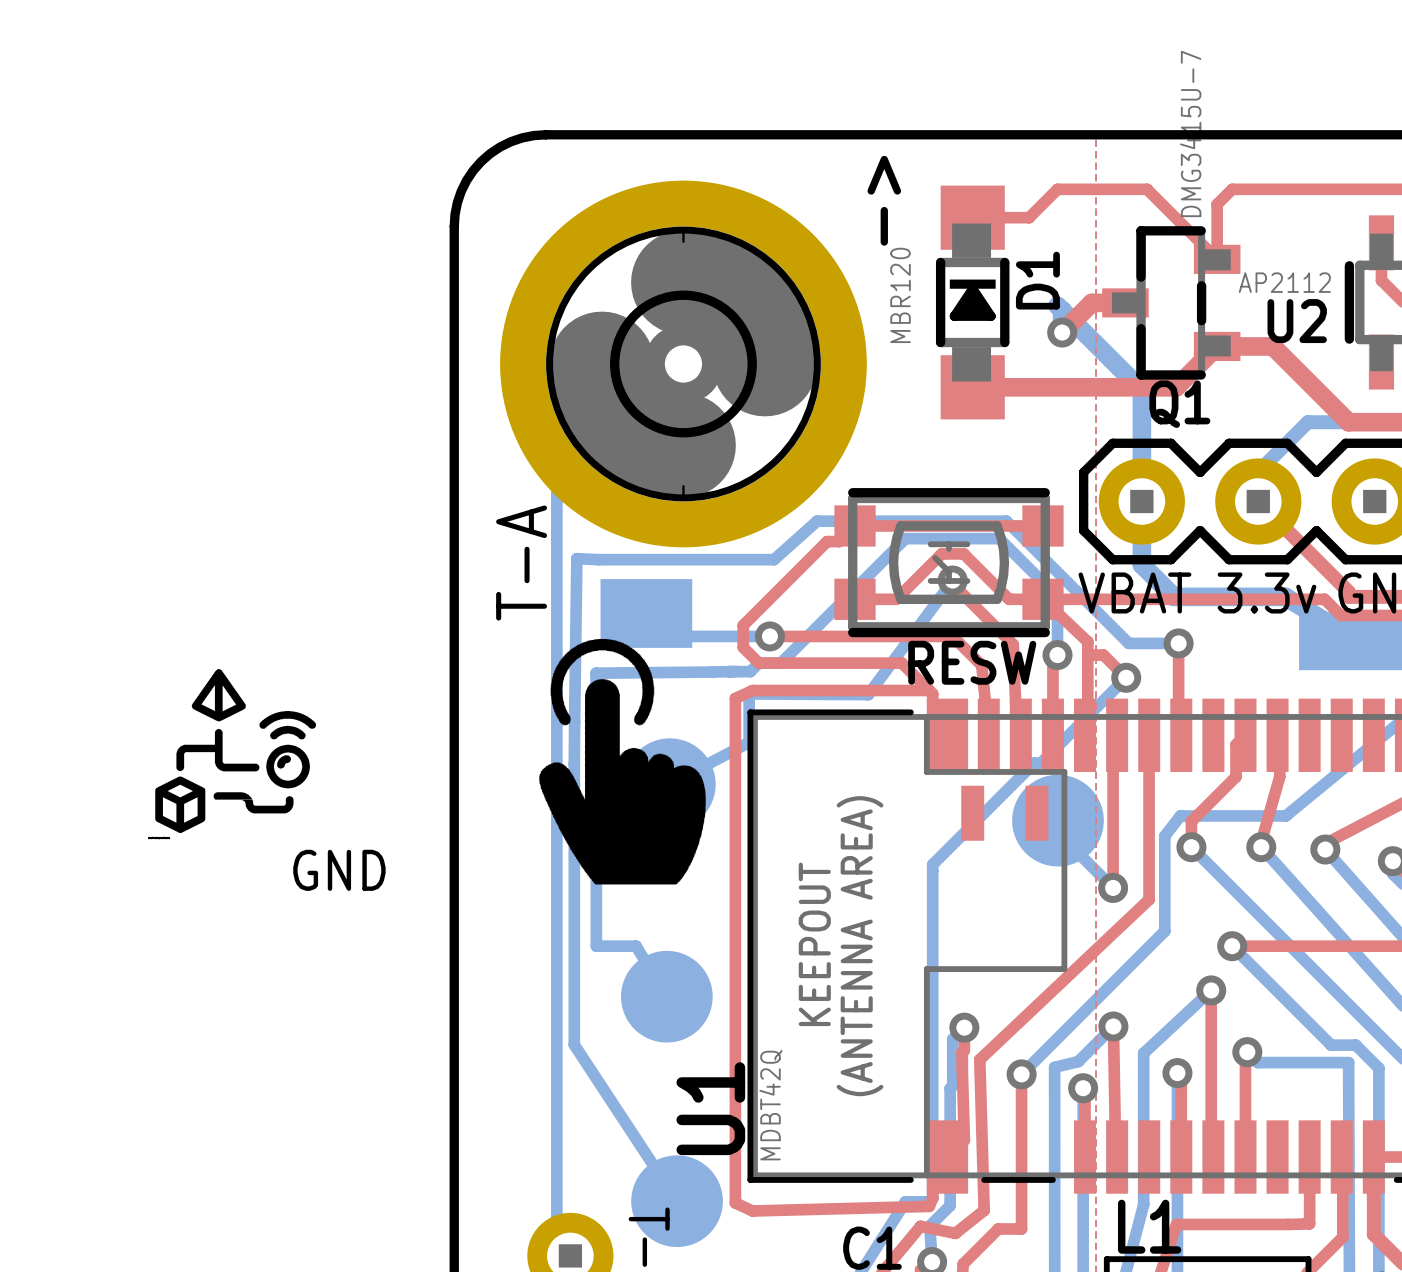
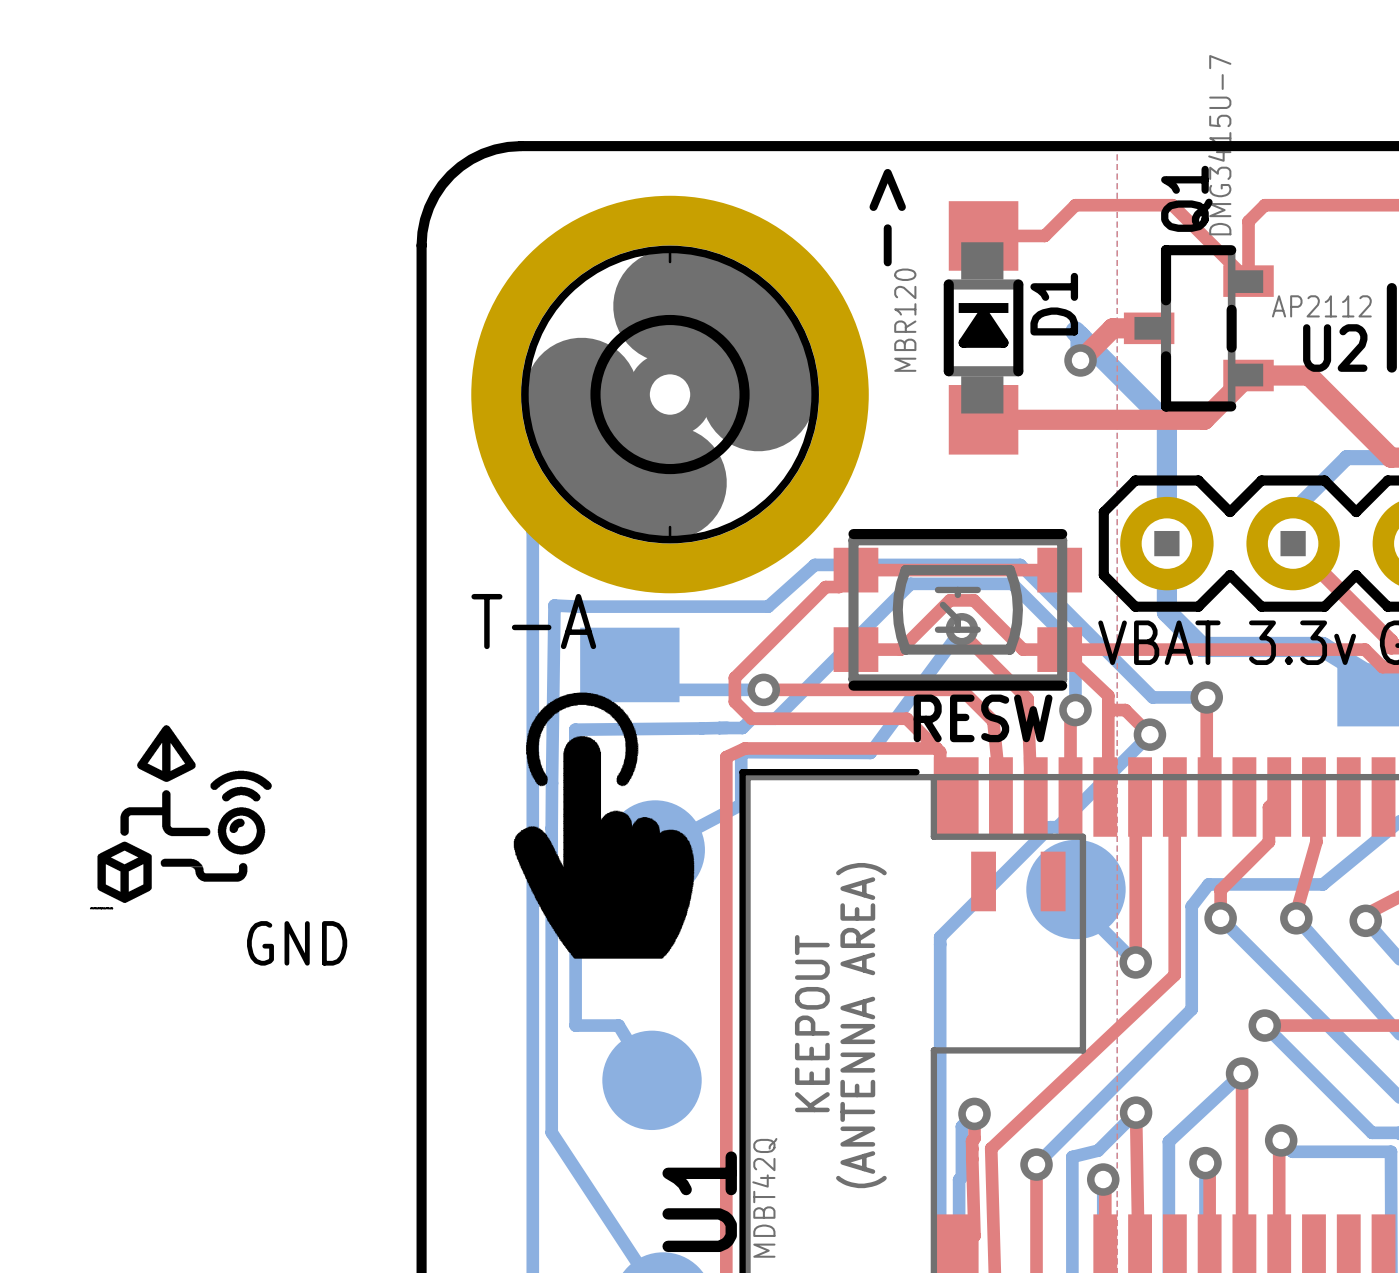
Q1 name rotation: 0° (1179, 404) -> 90° counterclockwise (1186, 198)
Q1 name position: Q1 (1179, 404) -> Q1 (1186, 198)
text rotation: 0° (521, 563) -> 90° clockwise (533, 621)

